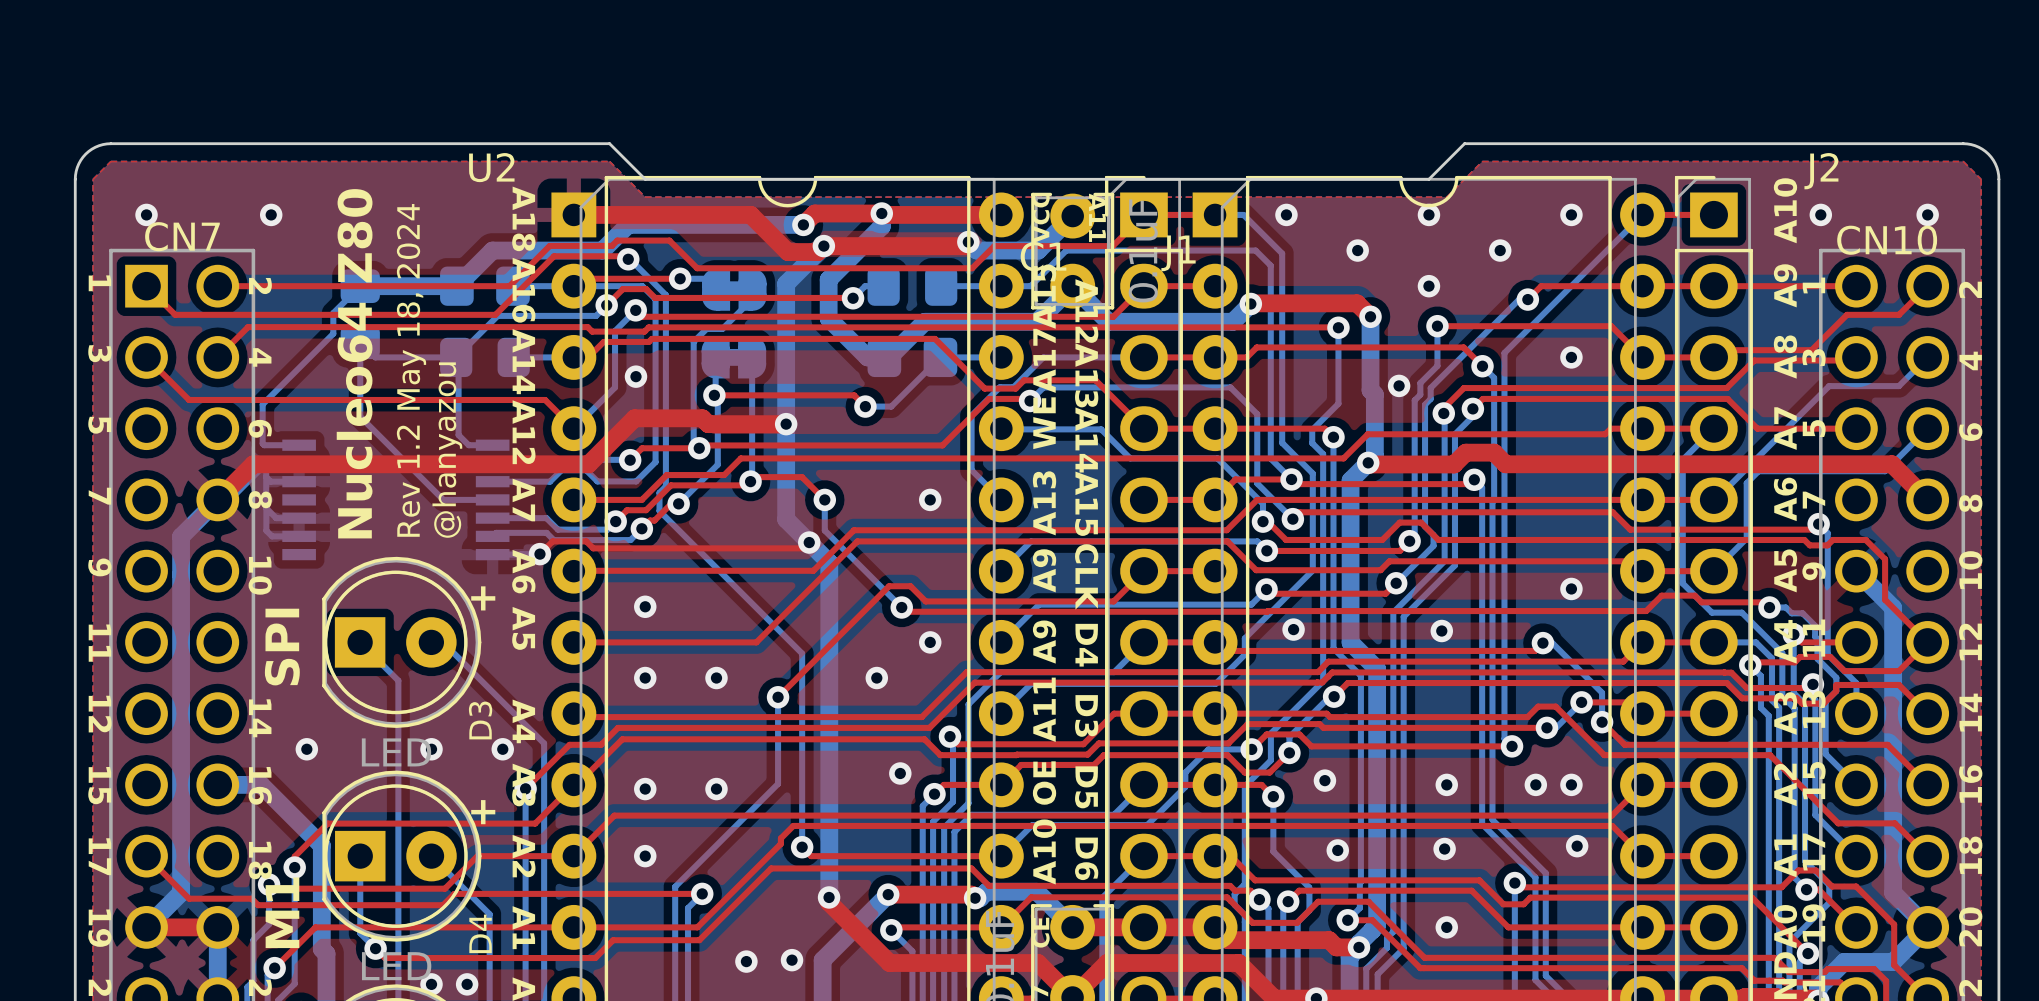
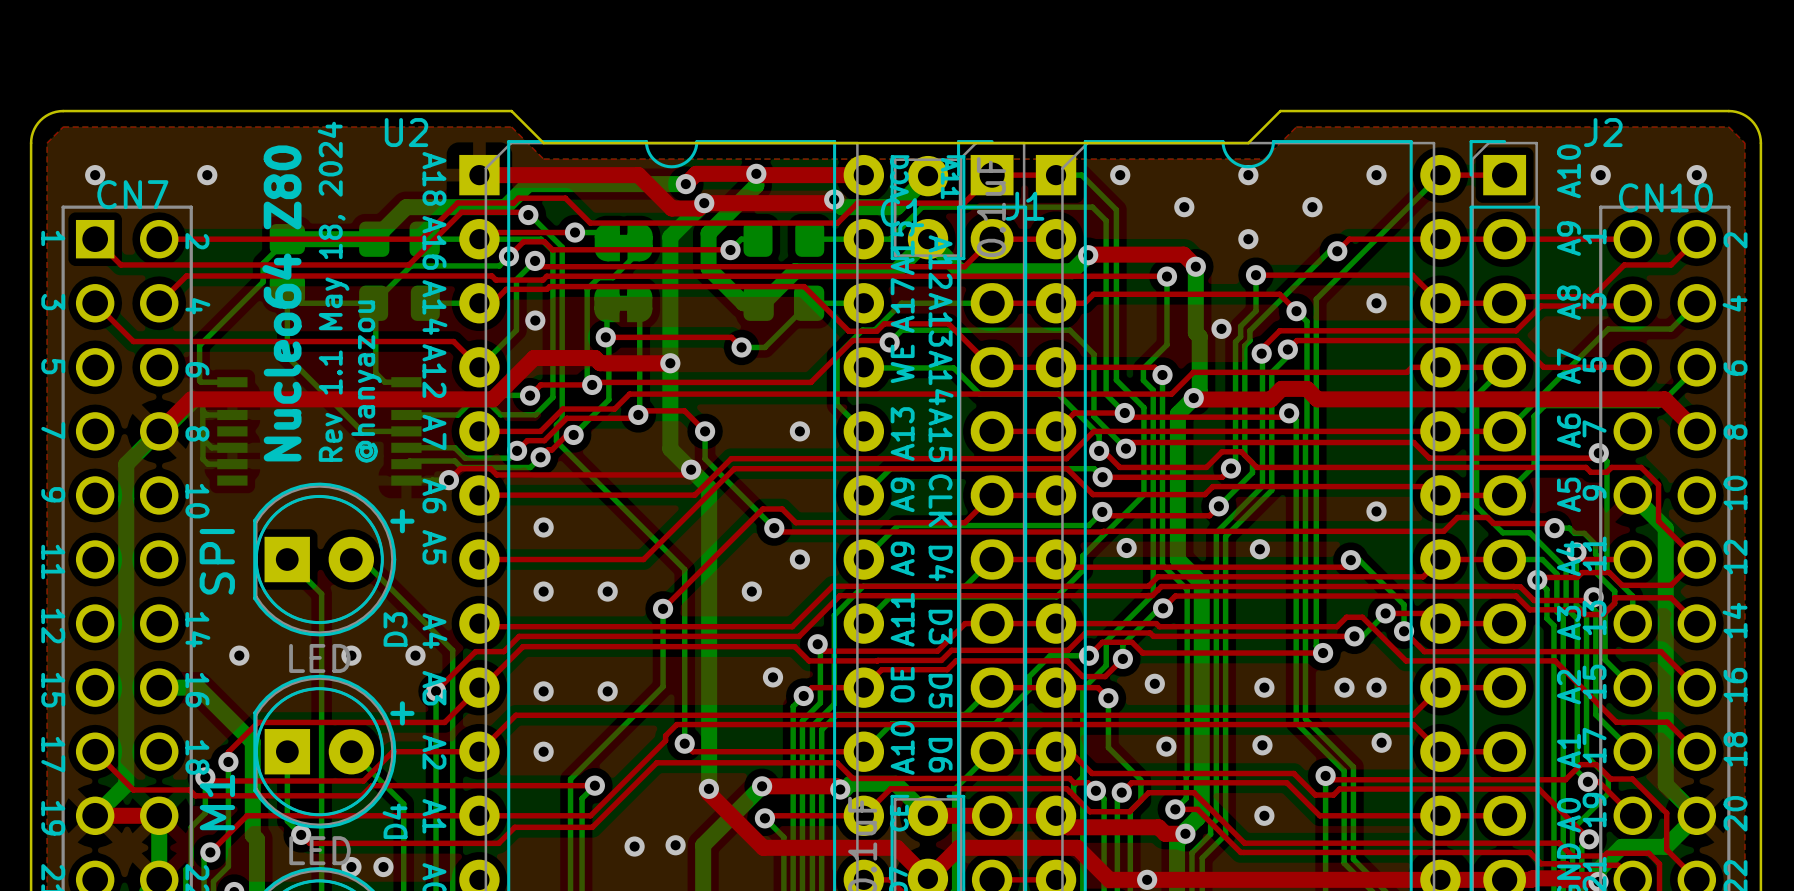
text: Rev 1.2 May 18, 2024 (411, 370) -> Rev 1.1 May 18, 2024 (333, 291)

